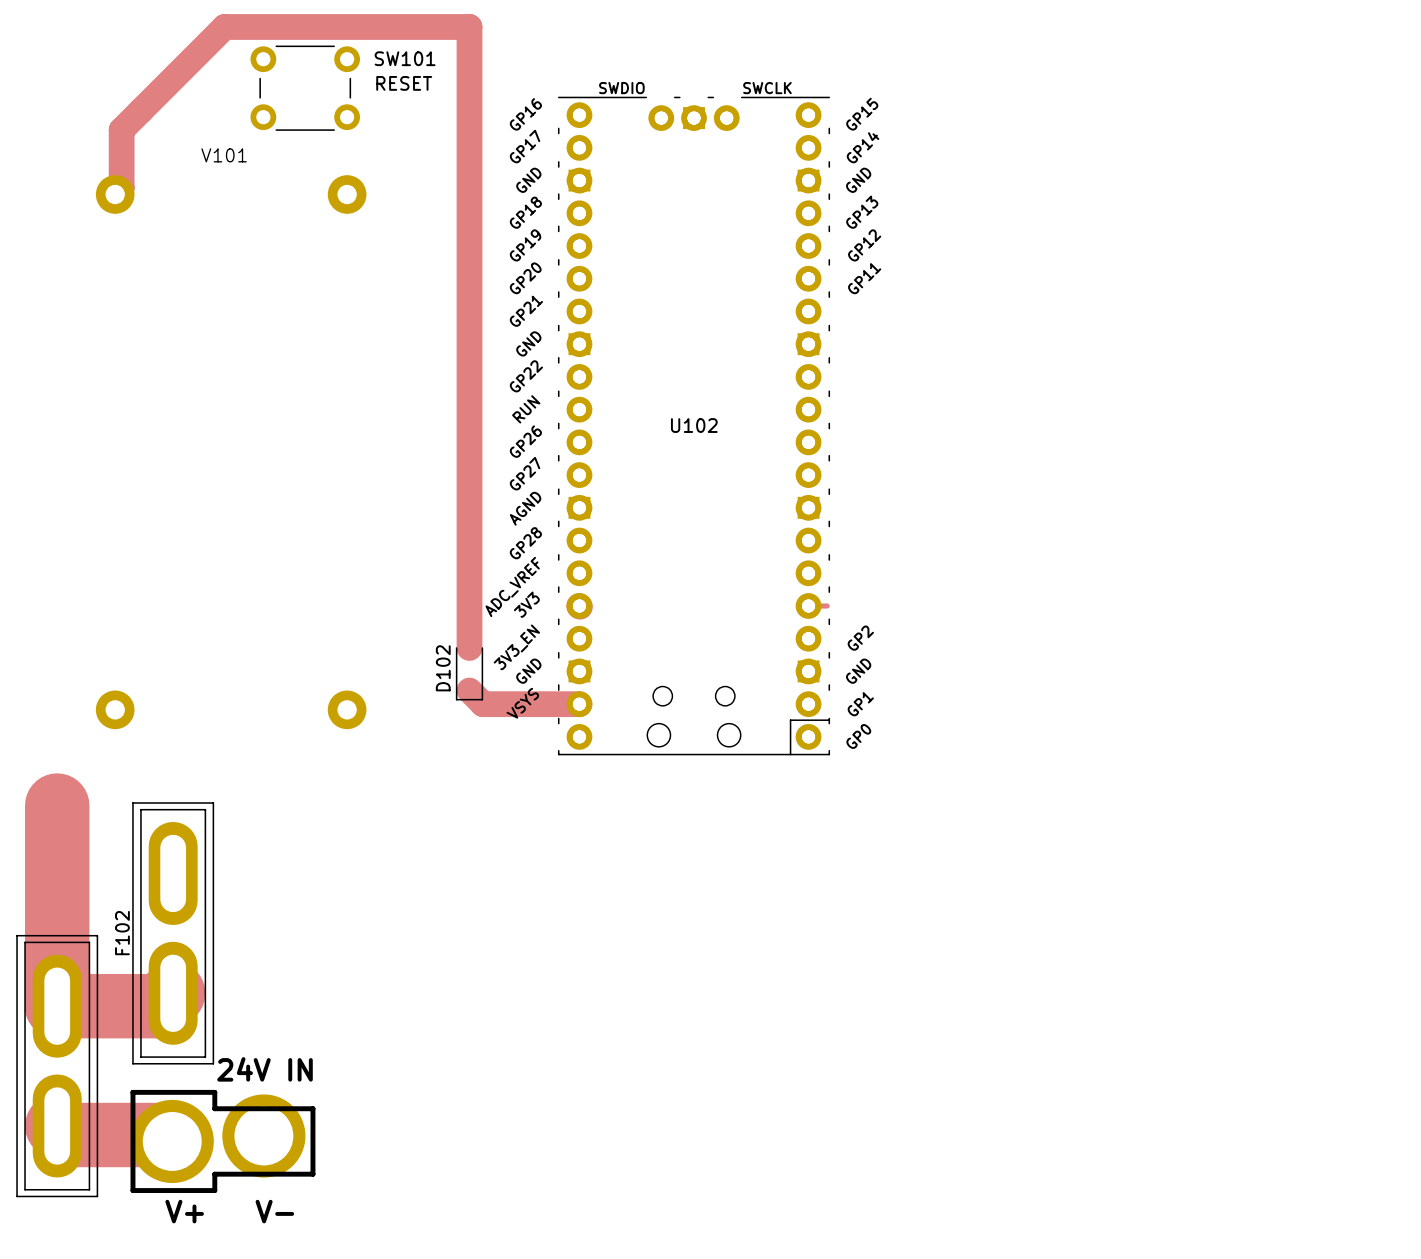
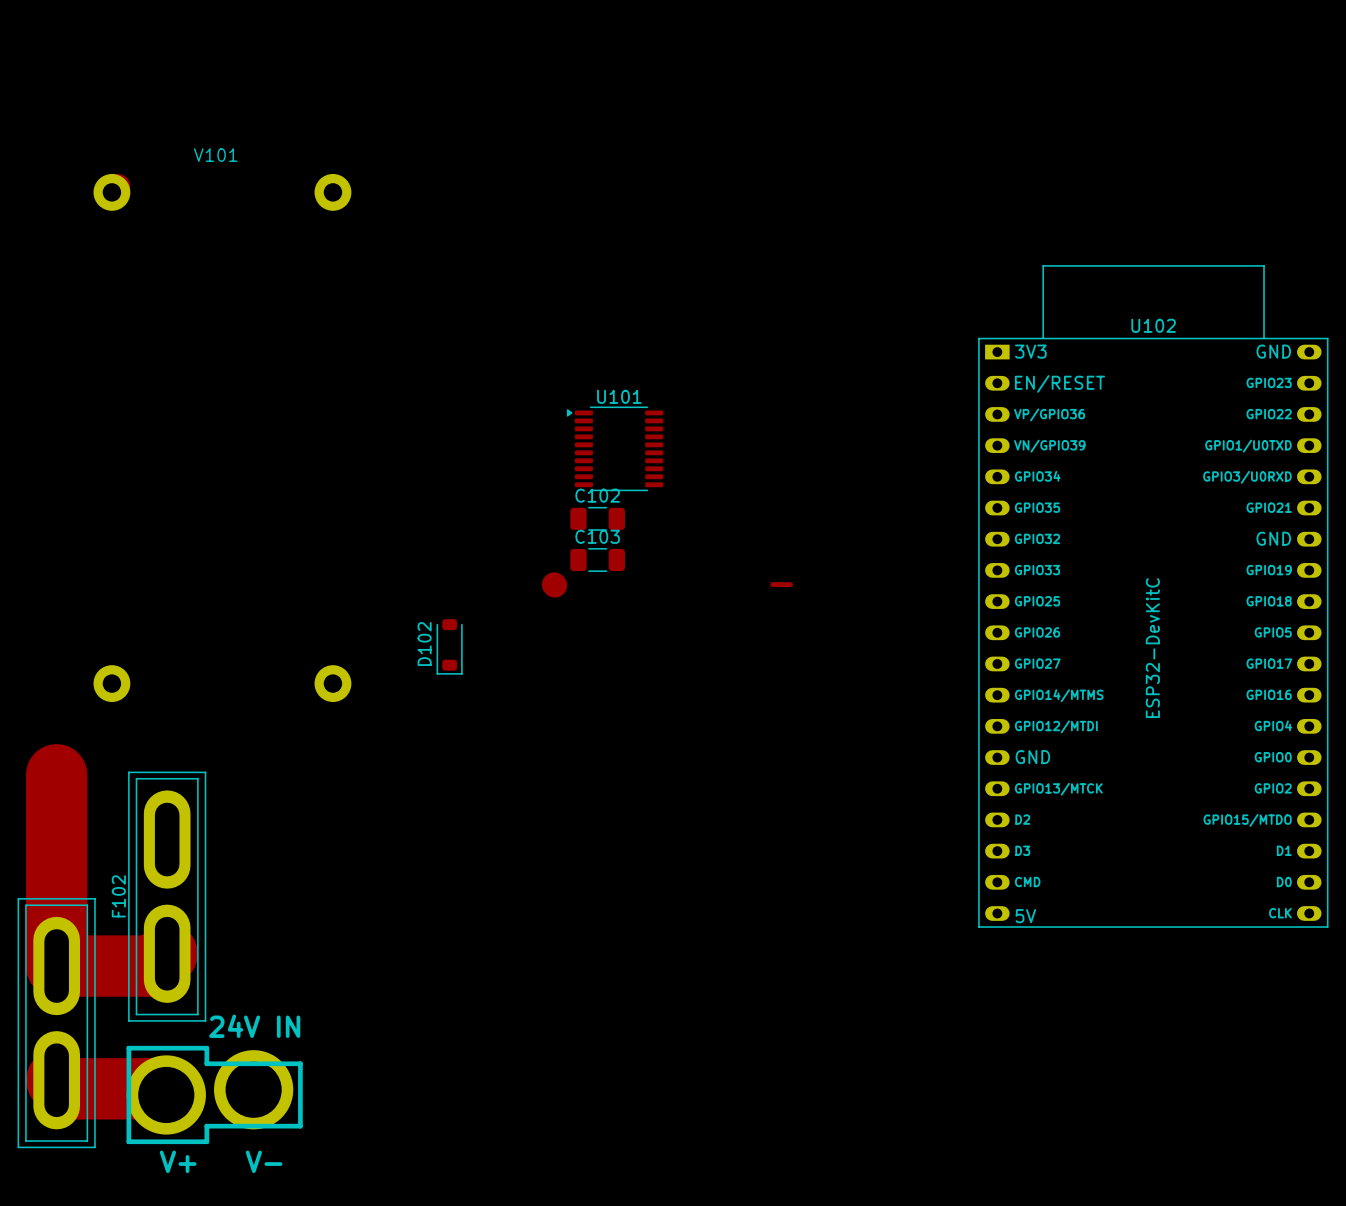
text: RESET (404, 83) -> none
SW101: (305, 88) -> none
U102 footprint: [557, 96, 831, 756] -> [978, 265, 1329, 928]
track: (121, 188) (121, 130) (224, 27) (469, 27) (469, 648) -> none
U102 name position: U102 (694, 425) -> U102 (1153, 325)
U101: none -> (615, 448)
C102: none -> (597, 518)
C103: none -> (597, 559)
U102 value: none -> ESP32-DevKitC (1152, 648)
track: (469, 690) (483, 704) (579, 704) -> none

